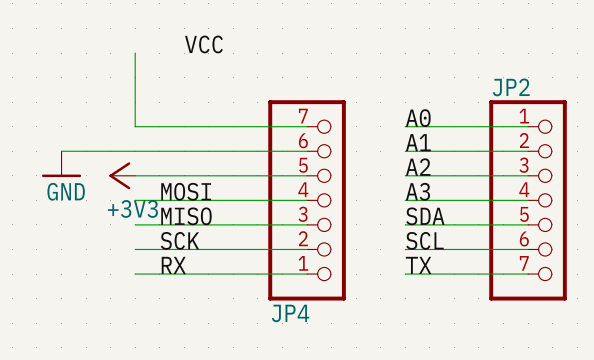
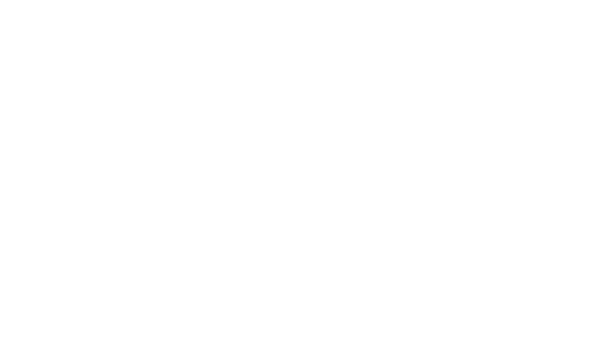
label: VCC (203, 44) -> none
wire: (135, 53) (135, 126) (307, 126) -> none
label: A0 (418, 118) -> none
wire: (405, 126) (528, 126) -> none
label: A1 (418, 142) -> none
wire: (61, 151) (307, 151) -> none
wire: (405, 151) (528, 151) -> none
power symbol: GND (61, 164) -> none
label: A2 (418, 167) -> none
power symbol: +3V3 (122, 175) -> none
wire: (135, 175) (307, 175) -> none
wire: (405, 175) (528, 175) -> none
label: MOSI (186, 191) -> none
label: A3 (417, 191) -> none
wire: (135, 200) (307, 200) -> none
JP4: (307, 200) -> none
wire: (405, 200) (528, 200) -> none
JP2: (528, 200) -> none
label: MISO (186, 216) -> none
label: SDA (425, 216) -> none
wire: (135, 224) (307, 224) -> none
wire: (405, 224) (528, 224) -> none
label: SCK (179, 240) -> none
label: SCL (424, 240) -> none
wire: (135, 249) (307, 249) -> none
wire: (405, 249) (528, 249) -> none
label: RX (173, 265) -> none
label: TX (418, 265) -> none
wire: (135, 274) (307, 274) -> none
wire: (405, 274) (528, 274) -> none

